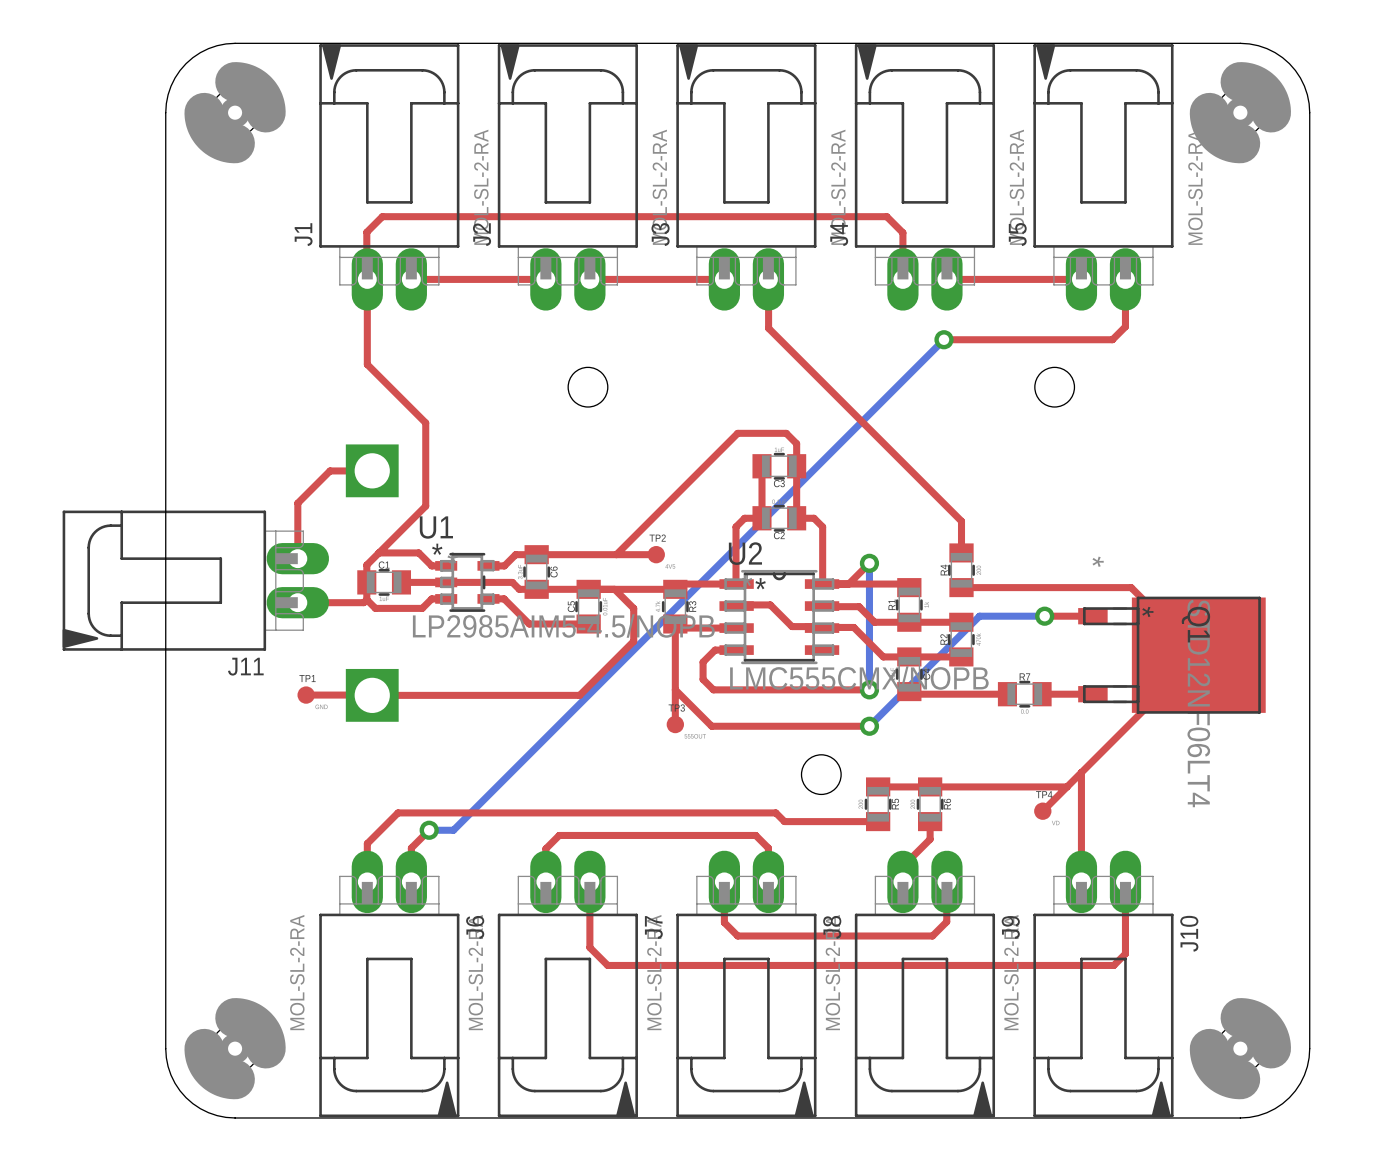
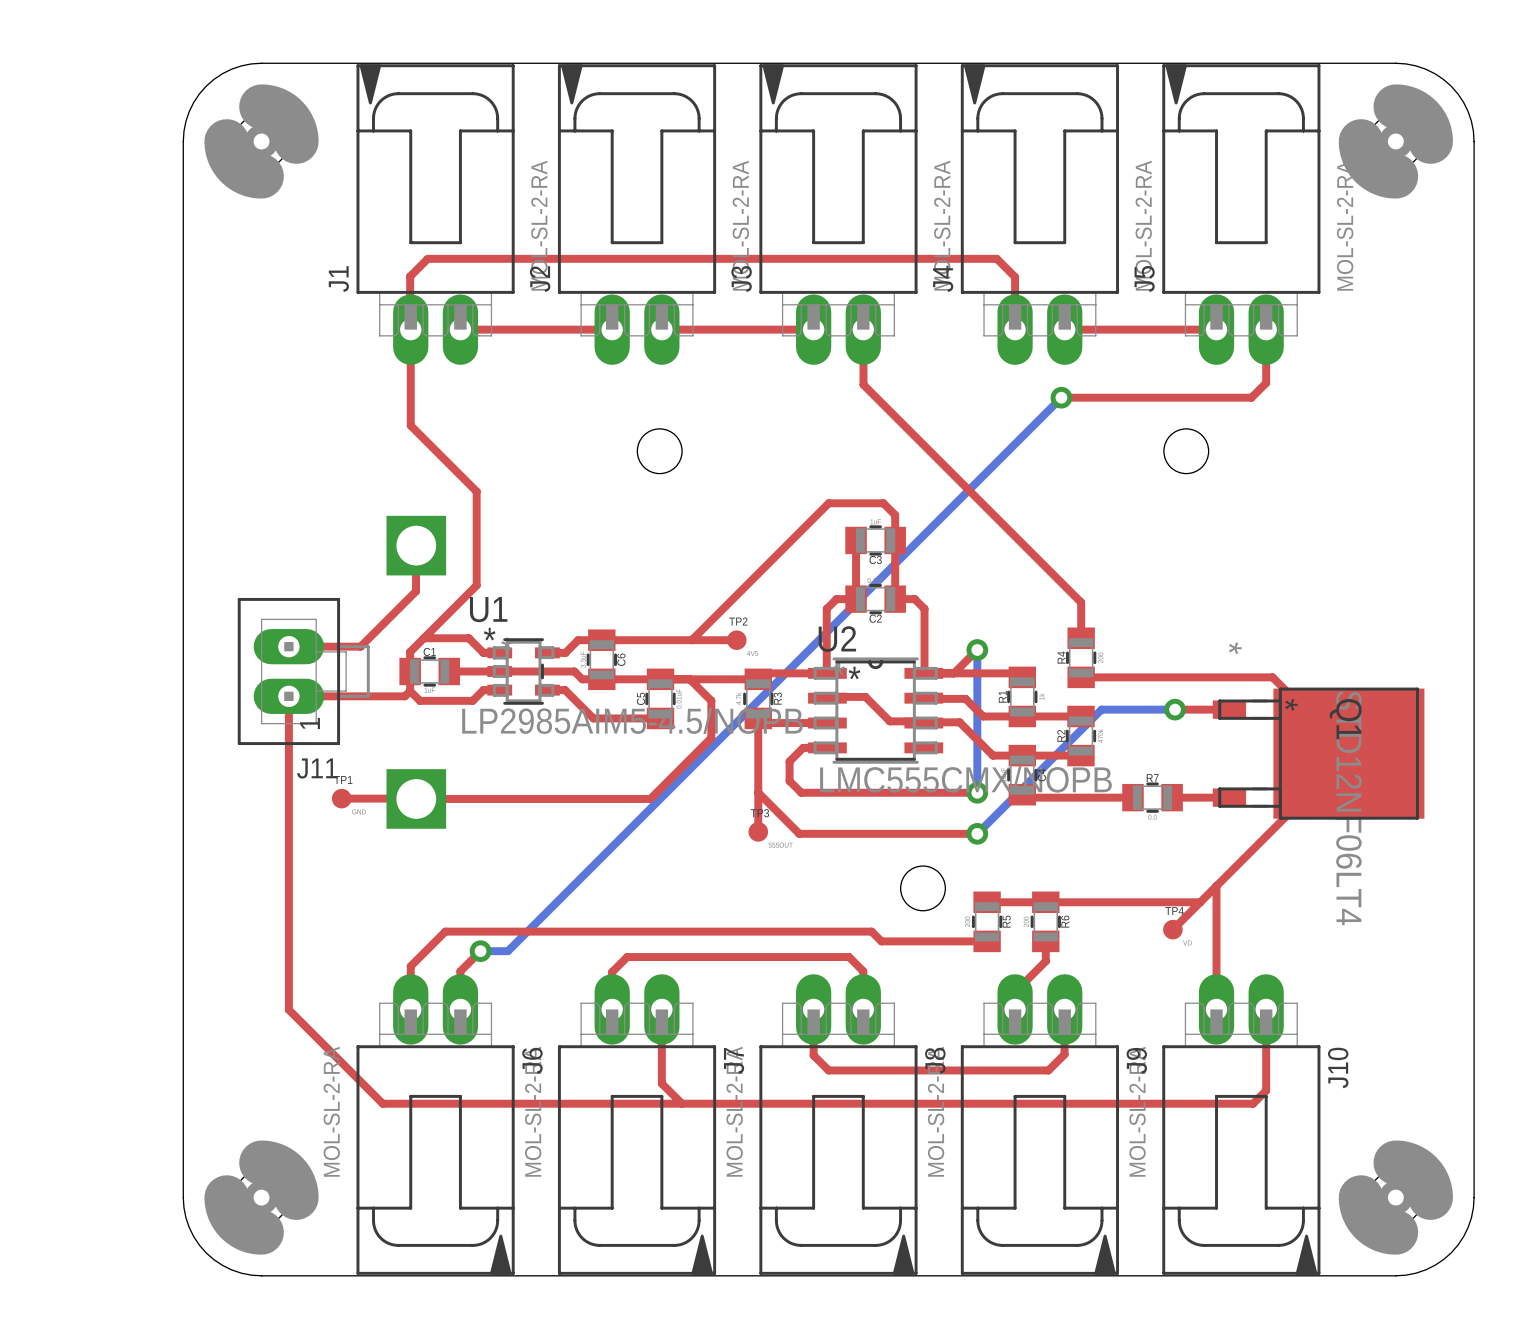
top track: (372, 470) (330, 470) (297, 503) (297, 558) -> (416, 545) (416, 591) (360, 646) (288, 646)
J11 footprint: [62, 510, 330, 651] -> [237, 597, 370, 746]
top track: (297, 602) (363, 602) -> (682, 1103) (382, 1103) (288, 1009) (288, 696) (404, 696) (406, 694)
J11 name position: J11 (245, 666) -> J11 (317, 768)

